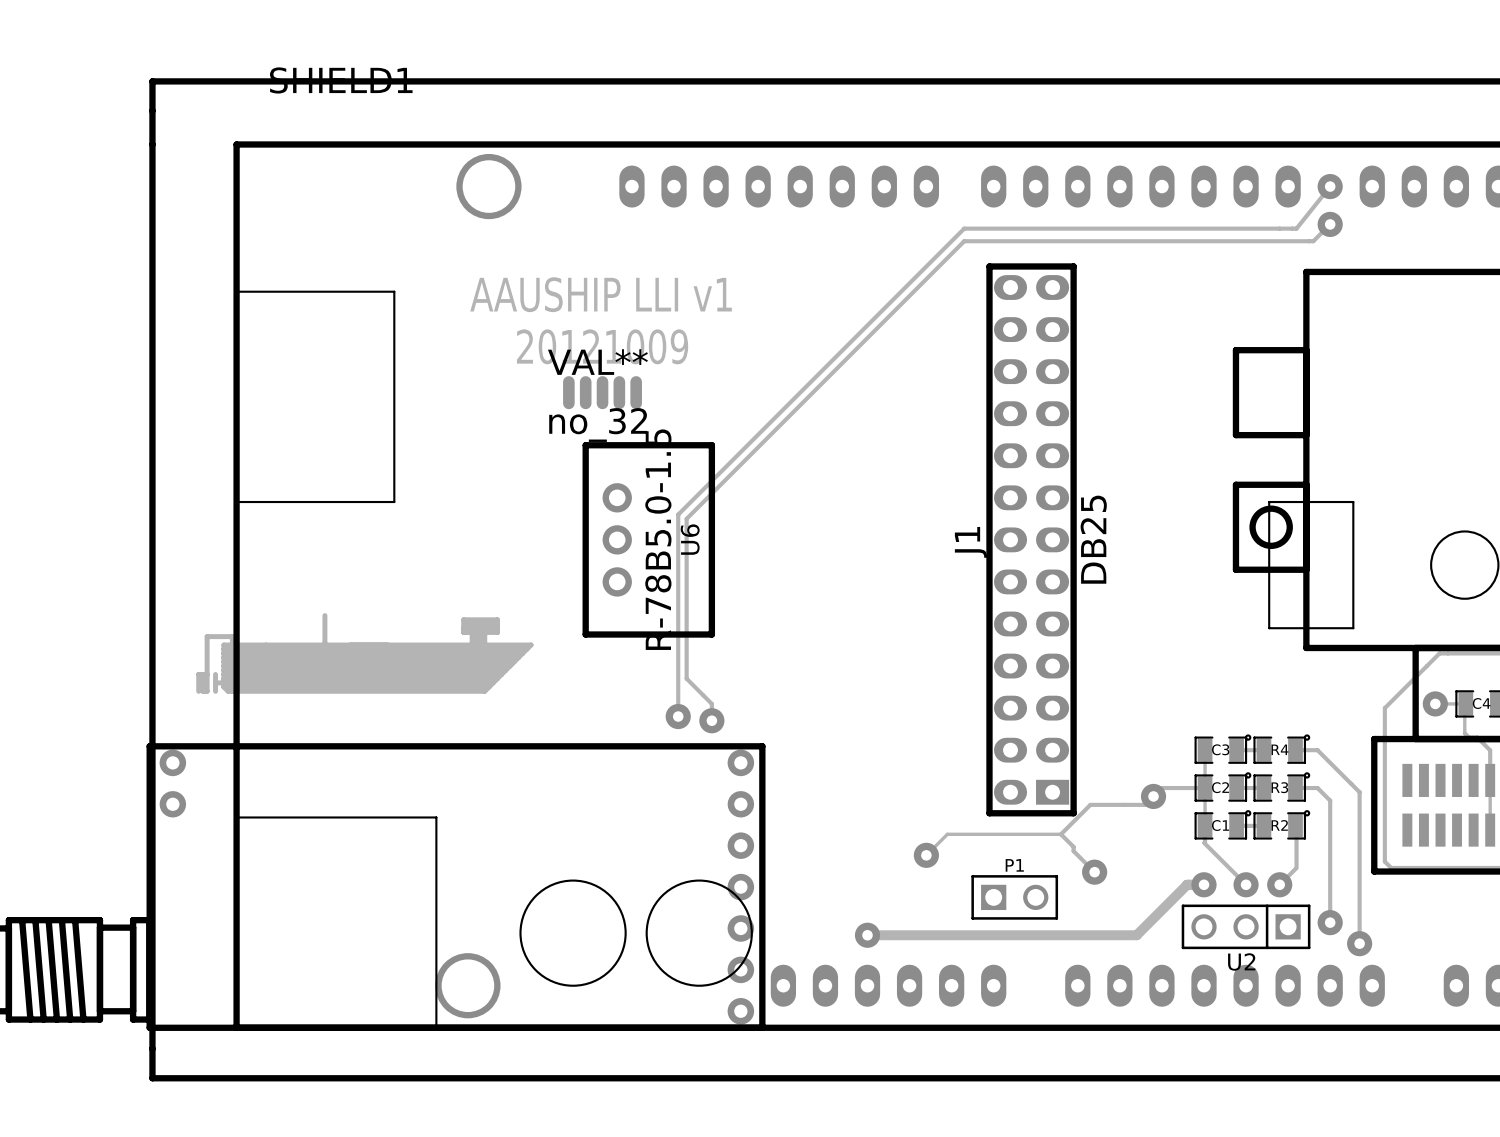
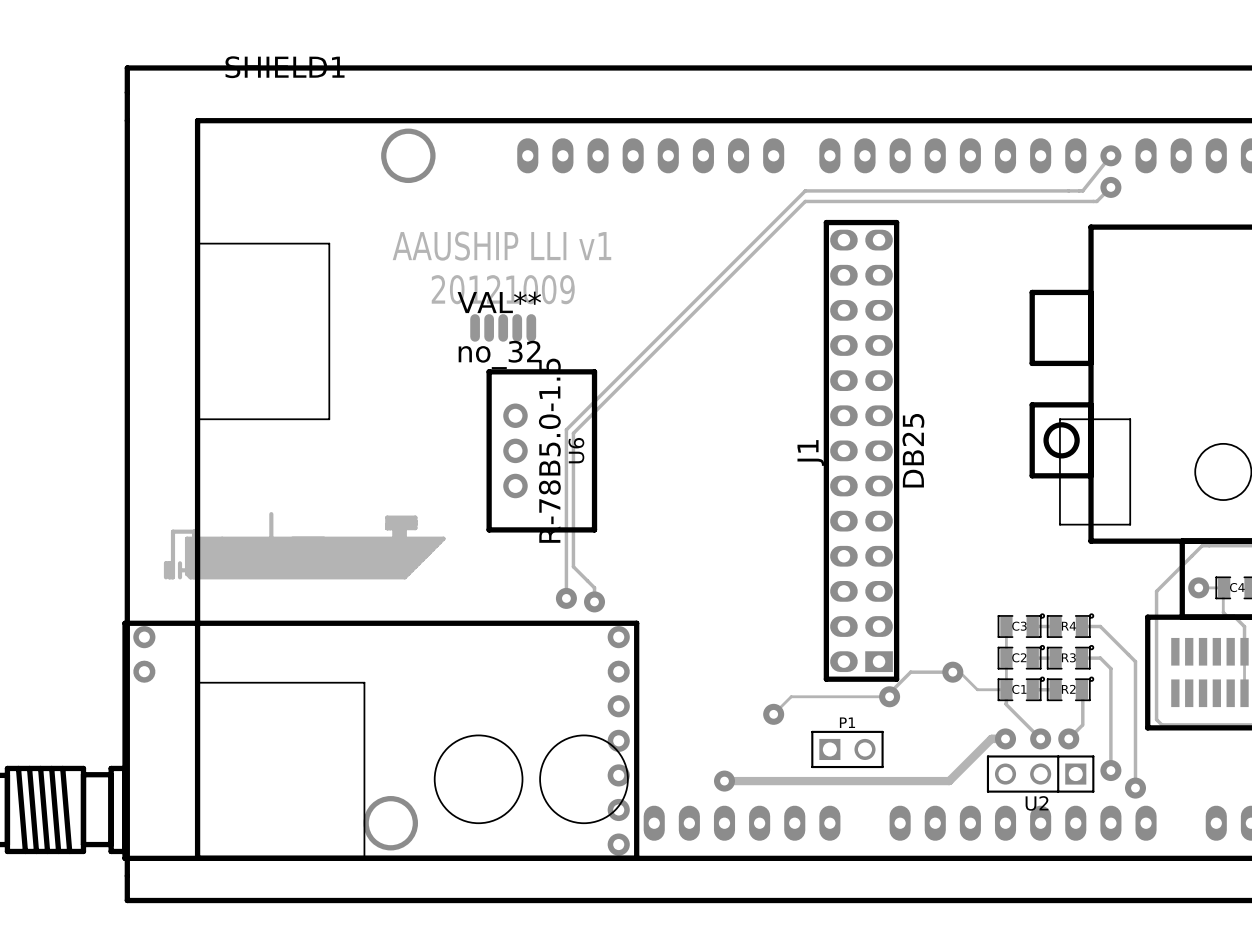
track: (1205, 788) (1161, 788) (1145, 804) -> (1006, 689) (977, 689) (959, 672) (956, 672)
via position: (1153, 796) -> (952, 672)
track: (1060, 834) (1073, 846) (1073, 851) (1094, 872) -> none
via: none -> (889, 696)
via: (1094, 872) -> none

